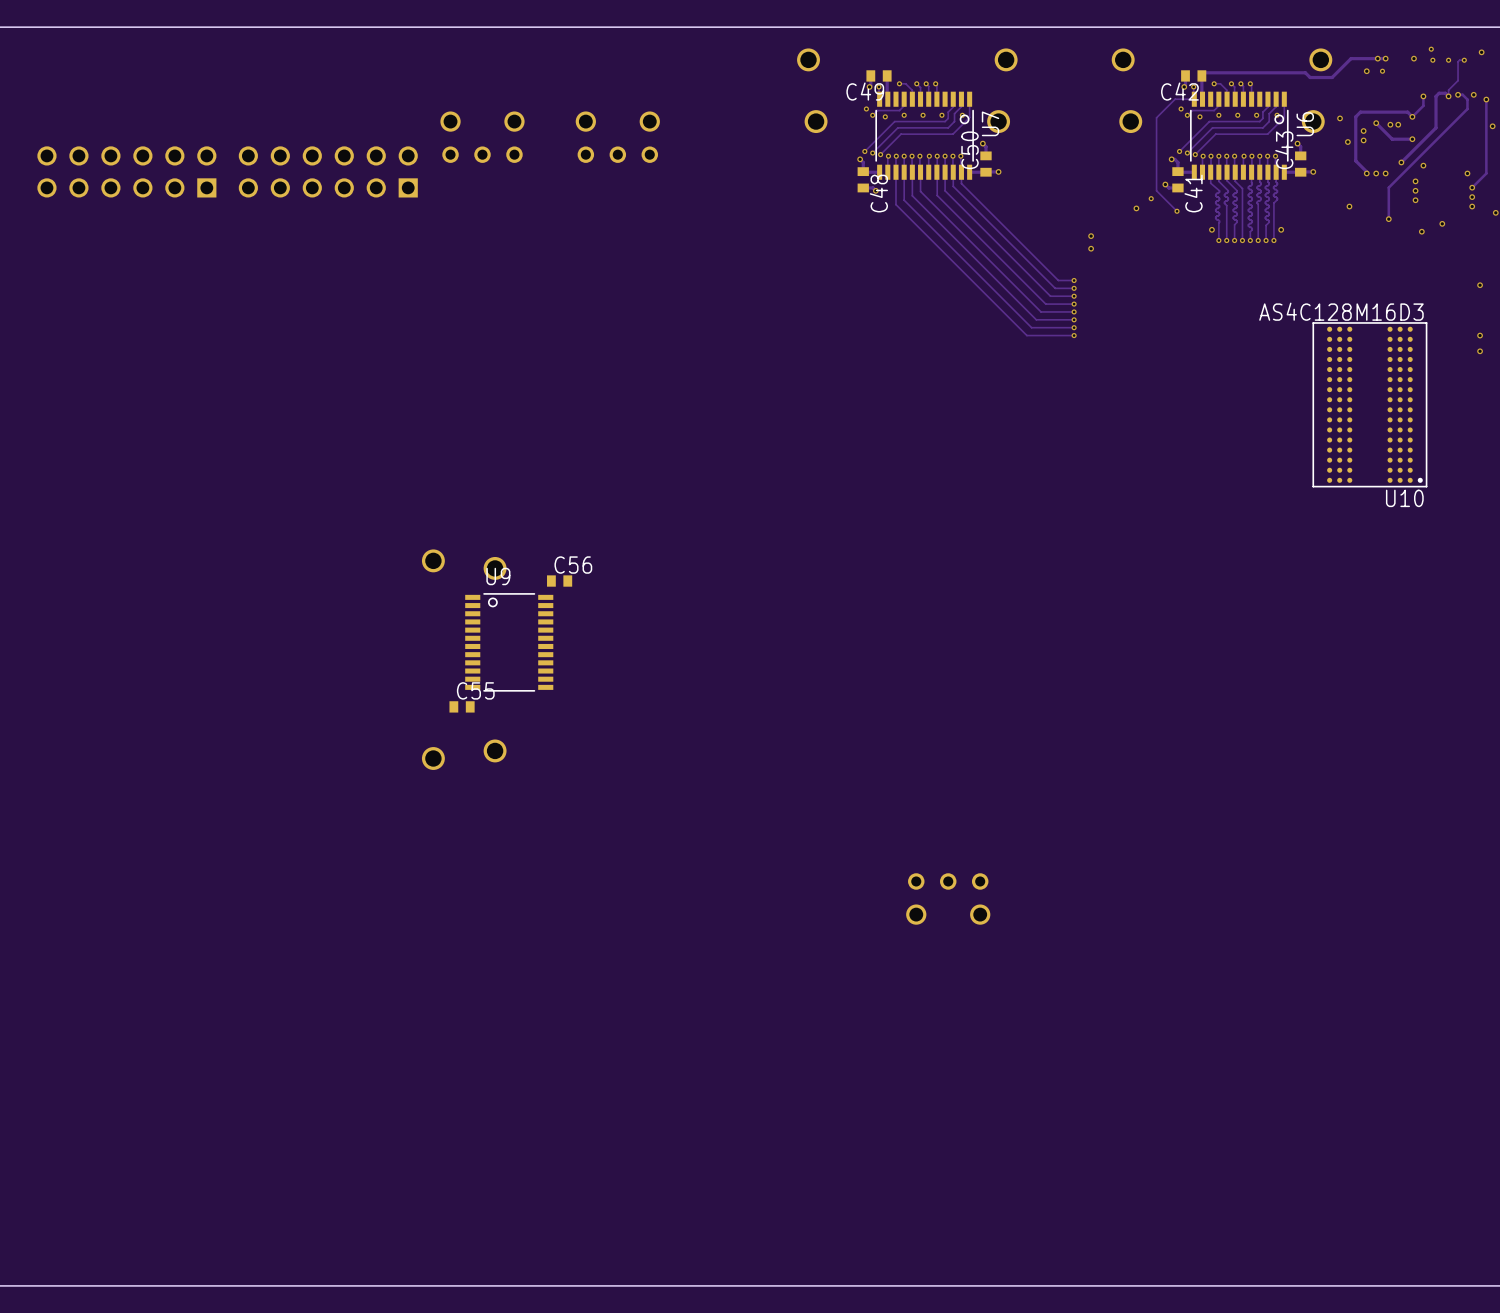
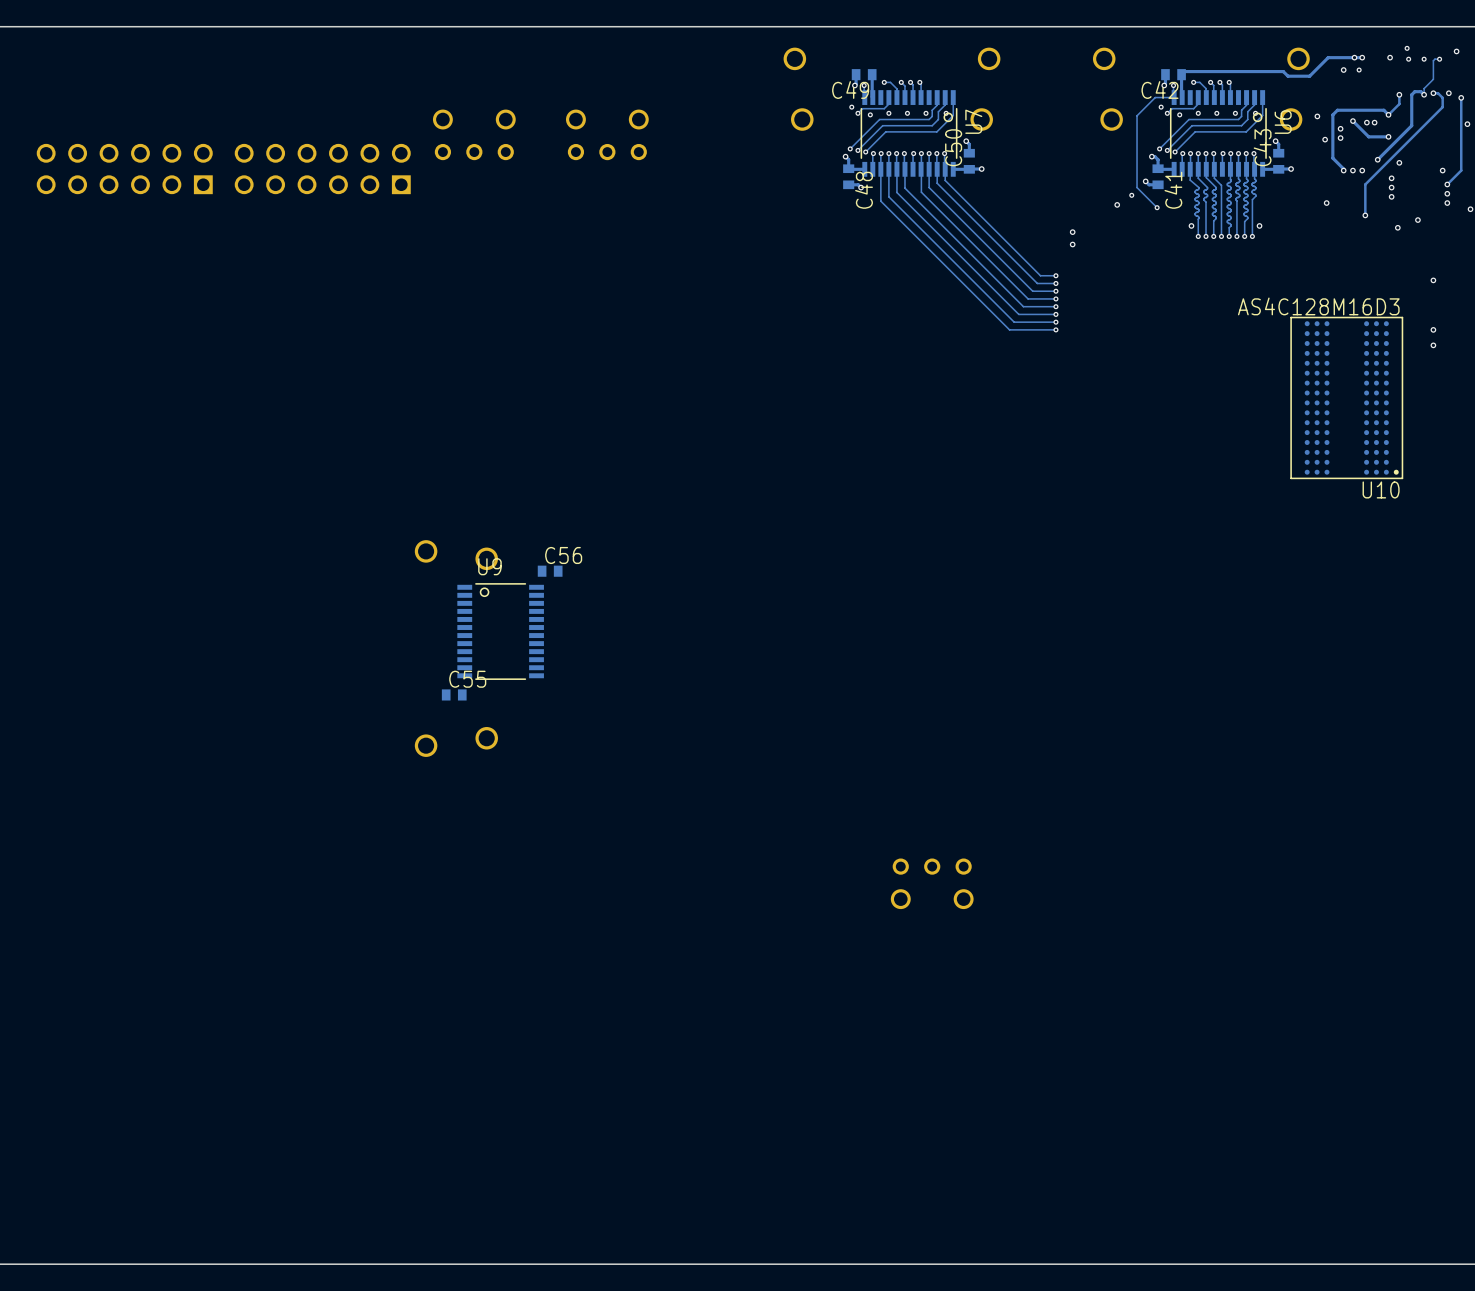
via: none -> (1433, 280)
via: (1480, 285) -> none
via: none -> (1433, 329)
via: (1480, 335) -> none
via: none -> (1433, 345)
via: (1480, 351) -> none

